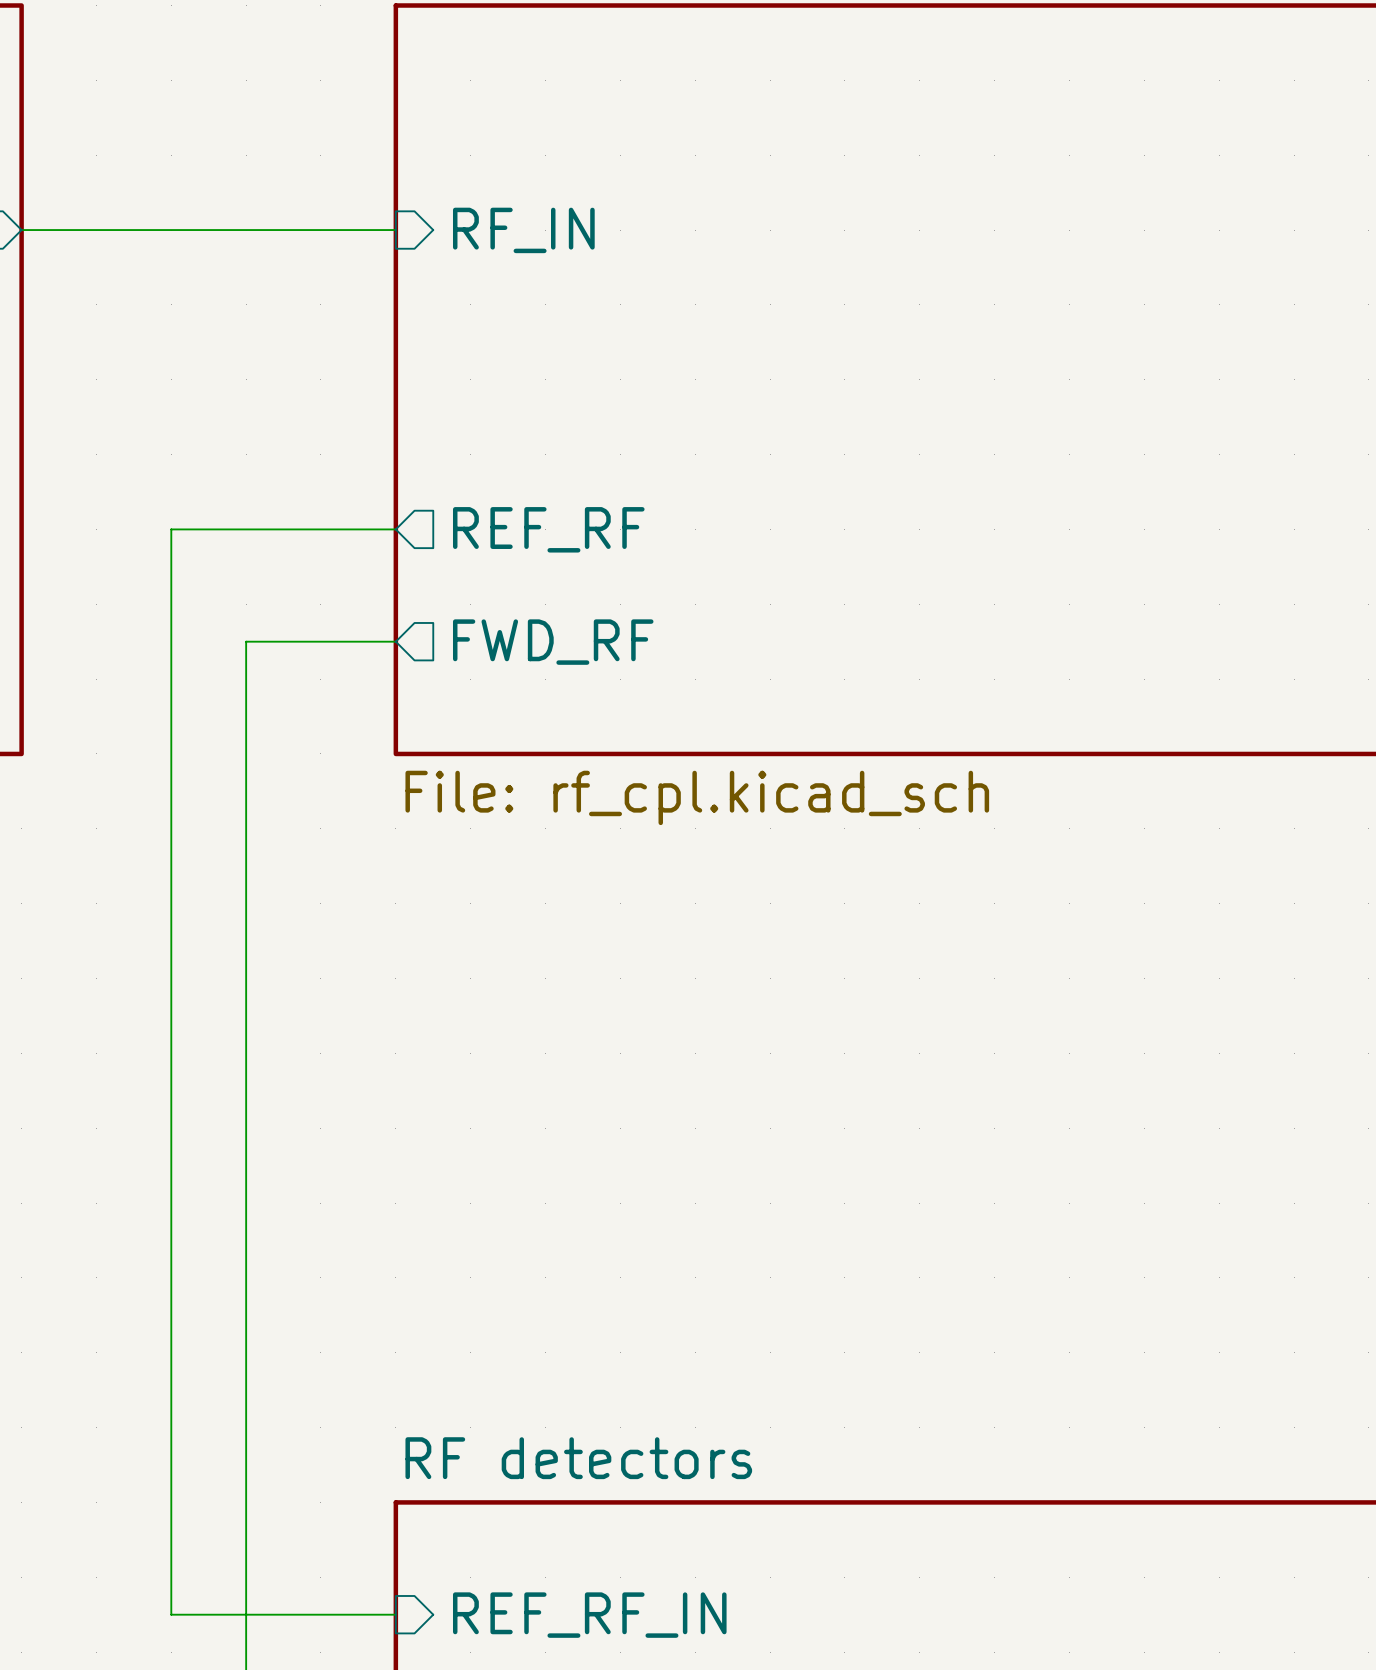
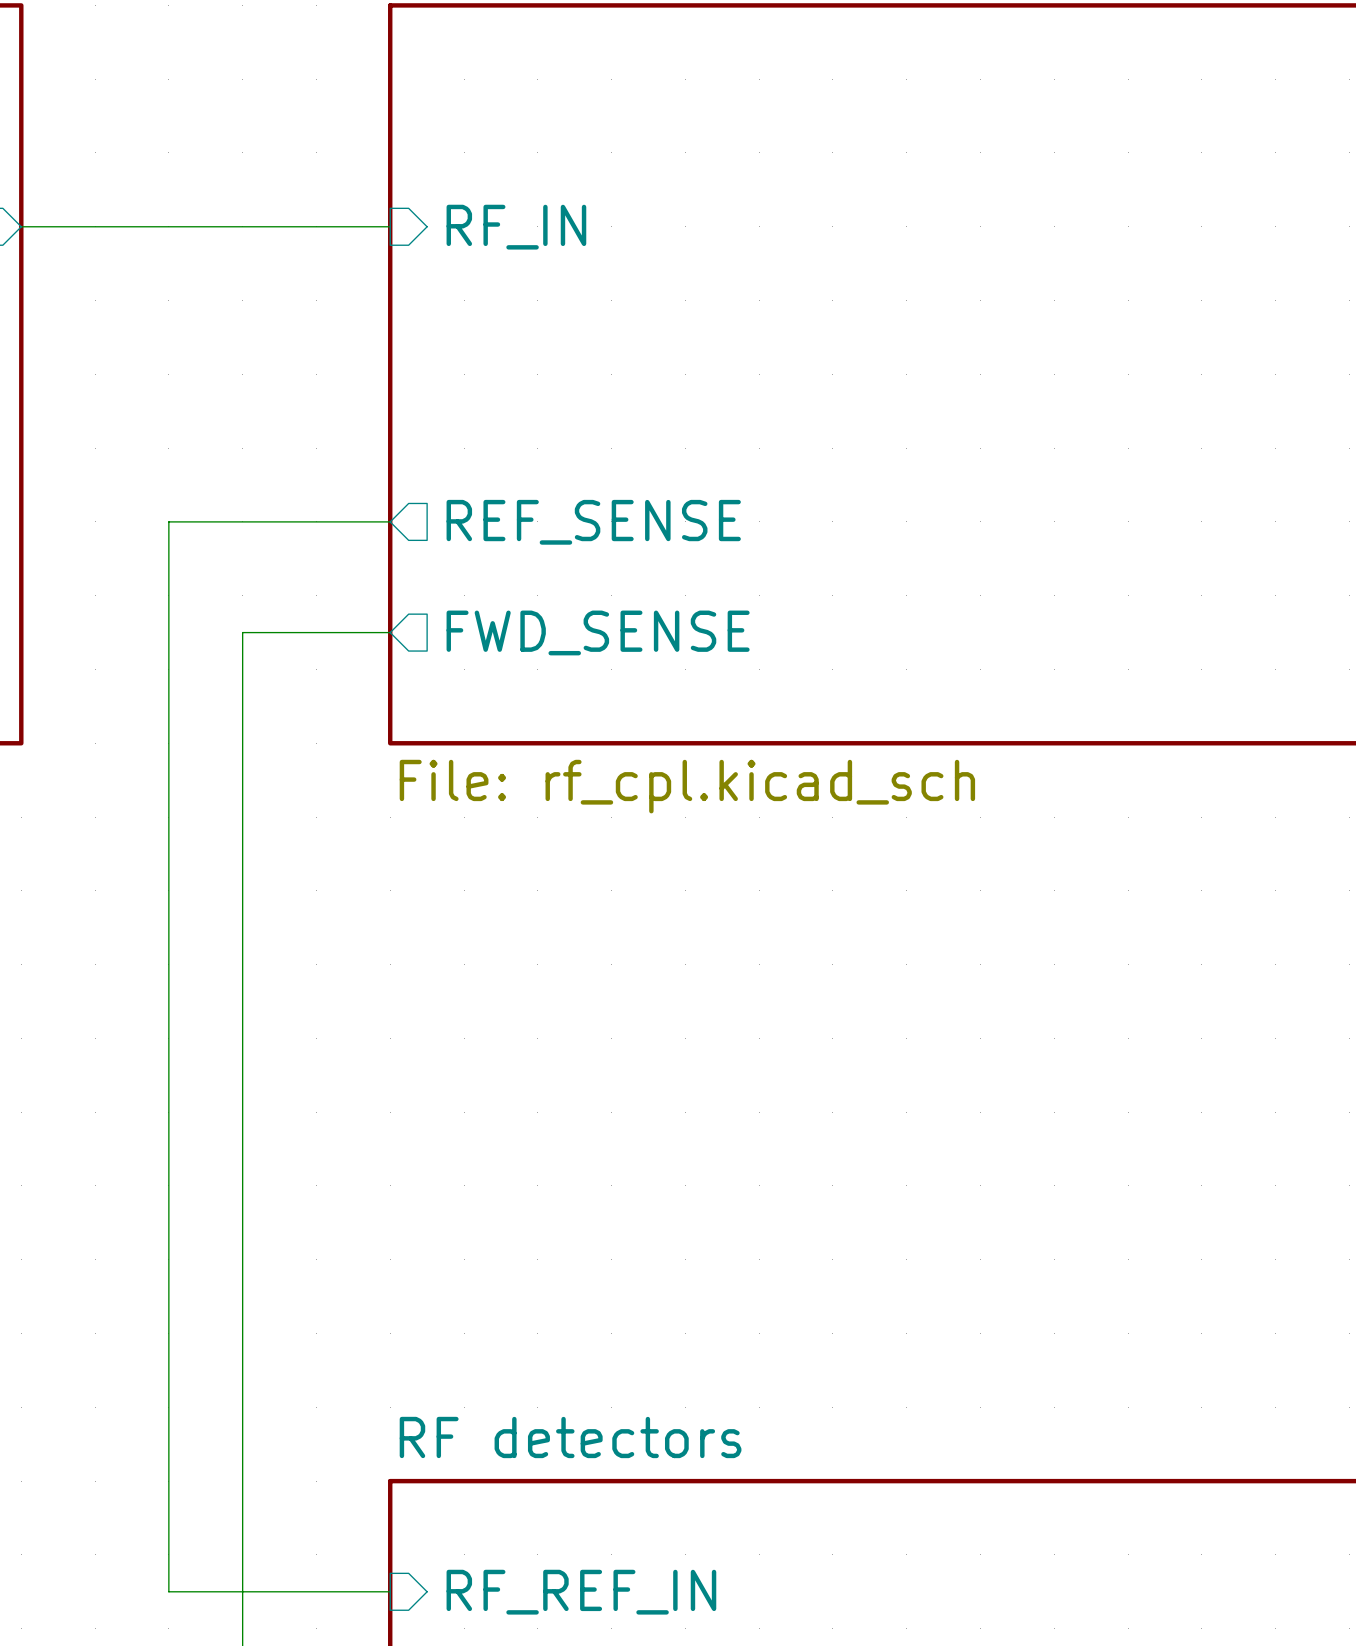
sheet pin: REF_RF (548, 529) -> REF_SENSE (593, 522)
sheet pin: FWD_RF (553, 642) -> FWD_SENSE (598, 632)
sheet pin: REF_RF_IN (589, 1615) -> RF_REF_IN (581, 1592)

